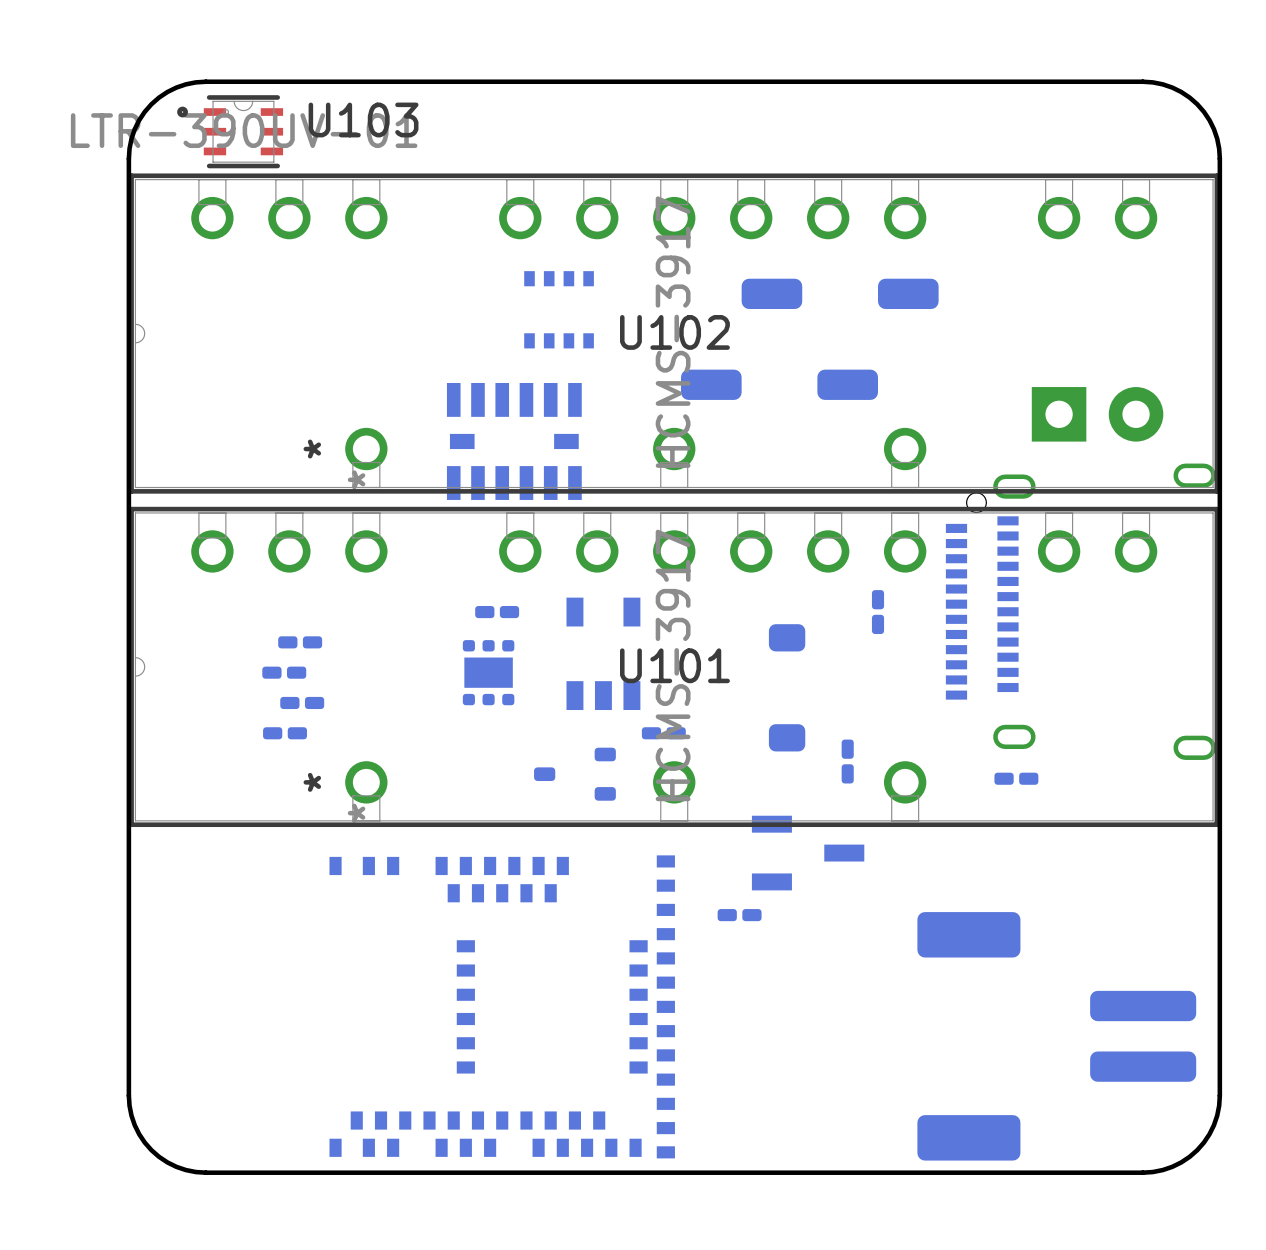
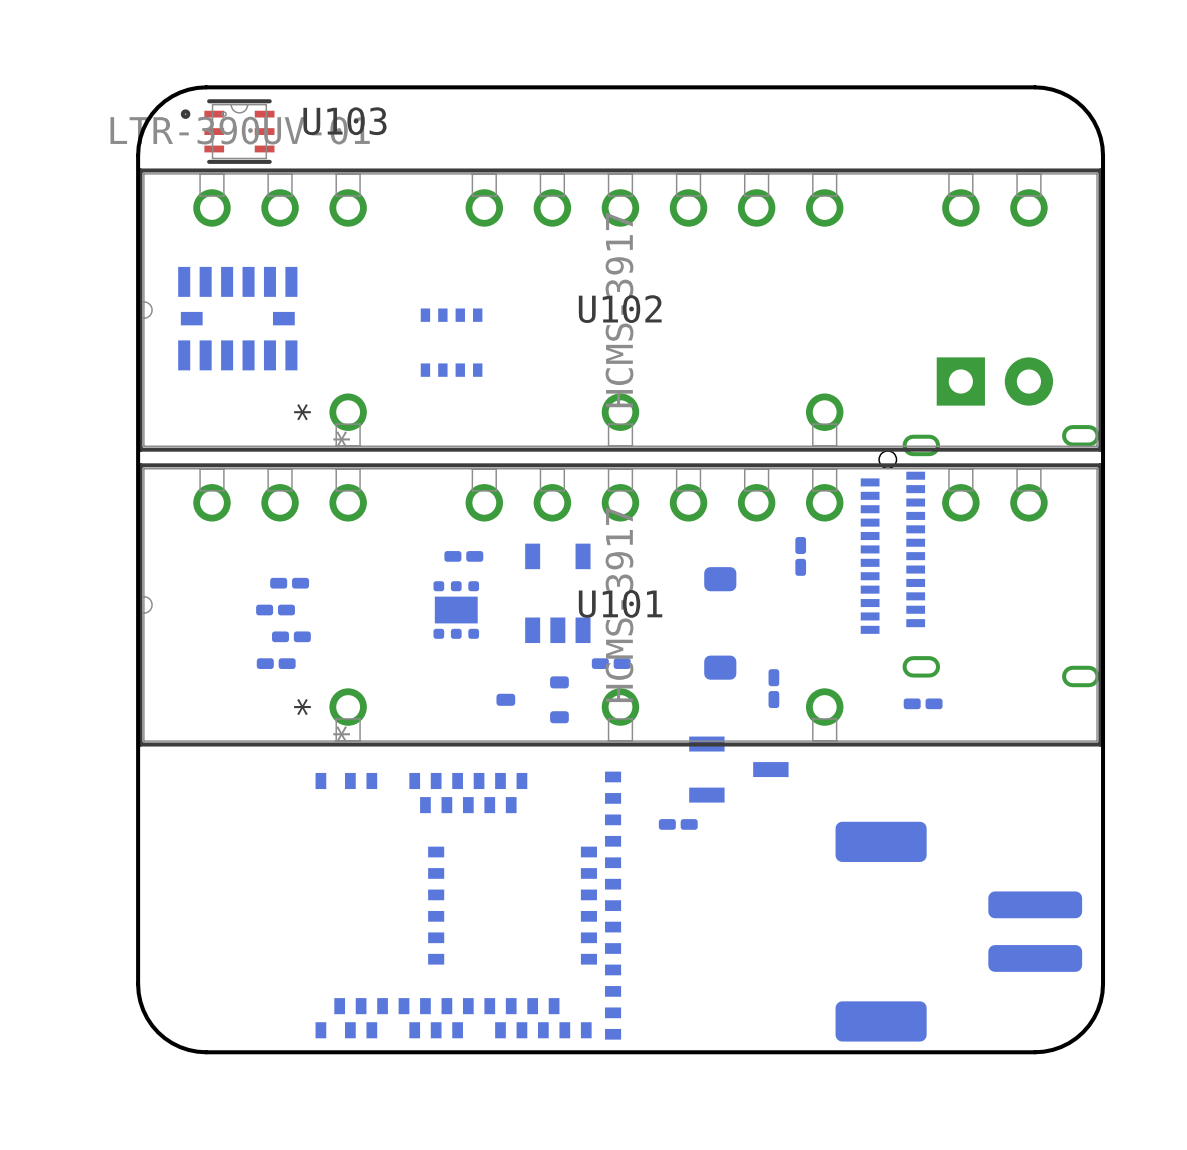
part: (771, 293) -> none
part: (908, 293) -> none
part position: (559, 309) -> (451, 342)
part: (711, 384) -> none
part: (847, 384) -> none
part position: (514, 441) -> (237, 318)

